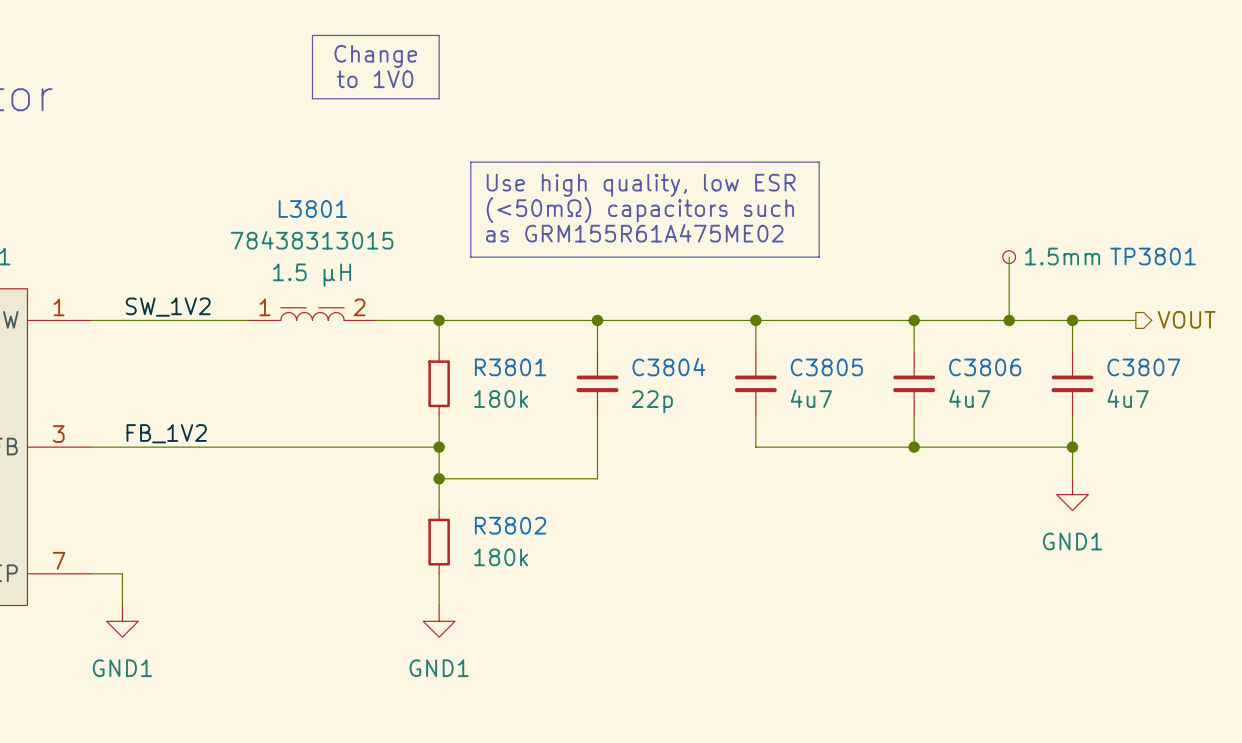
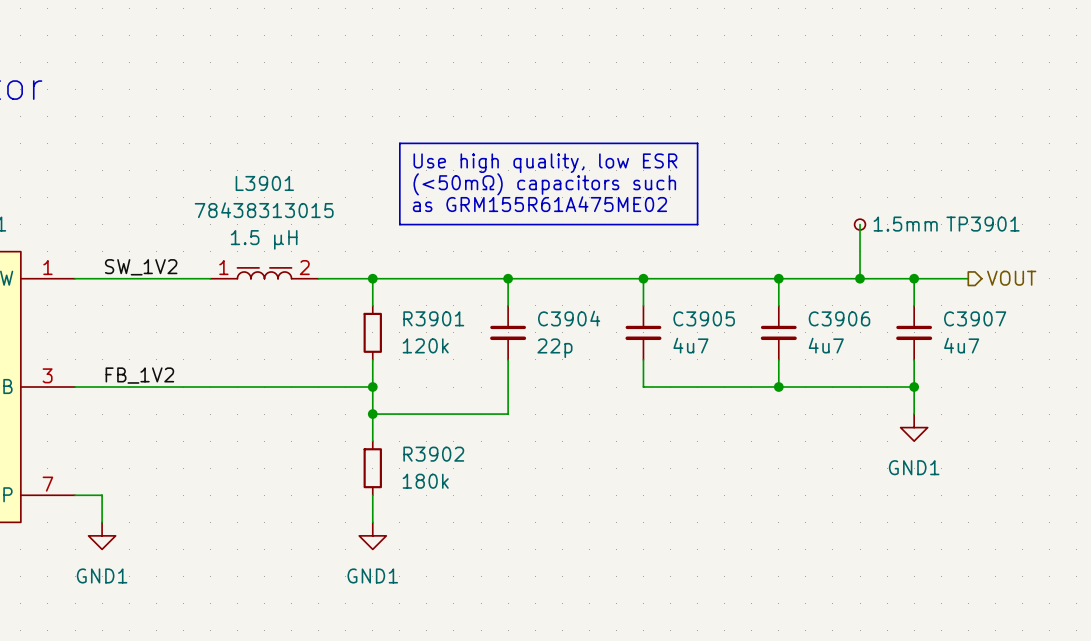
line: (312, 35) (439, 35) (439, 98) (312, 98) (312, 35) -> none
text: Change (375, 56) -> none
text: to 1V0 (375, 79) -> none
L3801 name: L3801 (312, 209) -> L3901 (264, 183)
TP3801 name: TP3801 (1153, 256) -> TP3901 (983, 224)
R3801 name: R3801 (510, 367) -> R3901 (433, 318)
C3804 name: C3804 (668, 367) -> C3904 (569, 318)
C3805 name: C3805 (826, 367) -> C3905 (704, 318)
C3806 name: C3806 (985, 367) -> C3906 (839, 318)
C3807 name: C3807 (1143, 367) -> C3907 (975, 318)
R3801 value: 180k (501, 399) -> 120k (425, 345)
R3802 name: R3802 (510, 525) -> R3902 (433, 454)

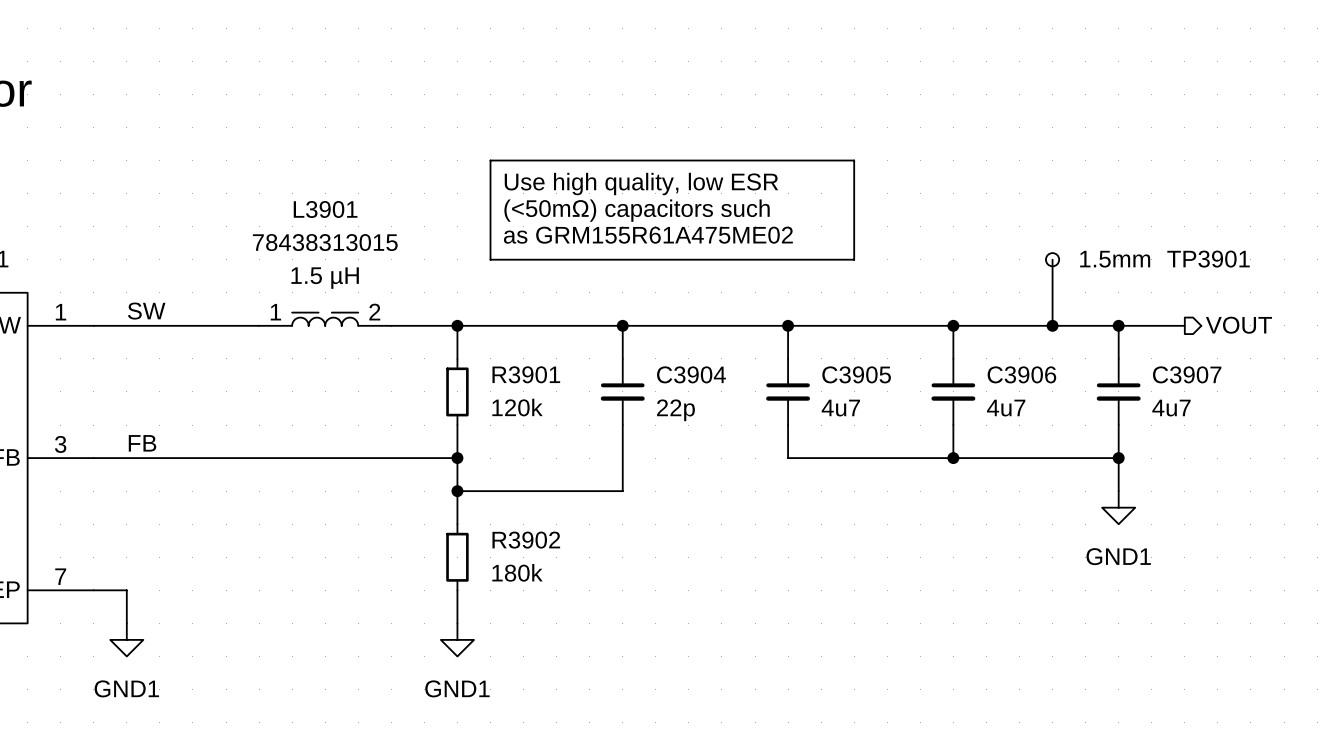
label: SW_1V2 (141, 267) -> SW (146, 311)
label: FB_1V2 (139, 375) -> FB (142, 443)

